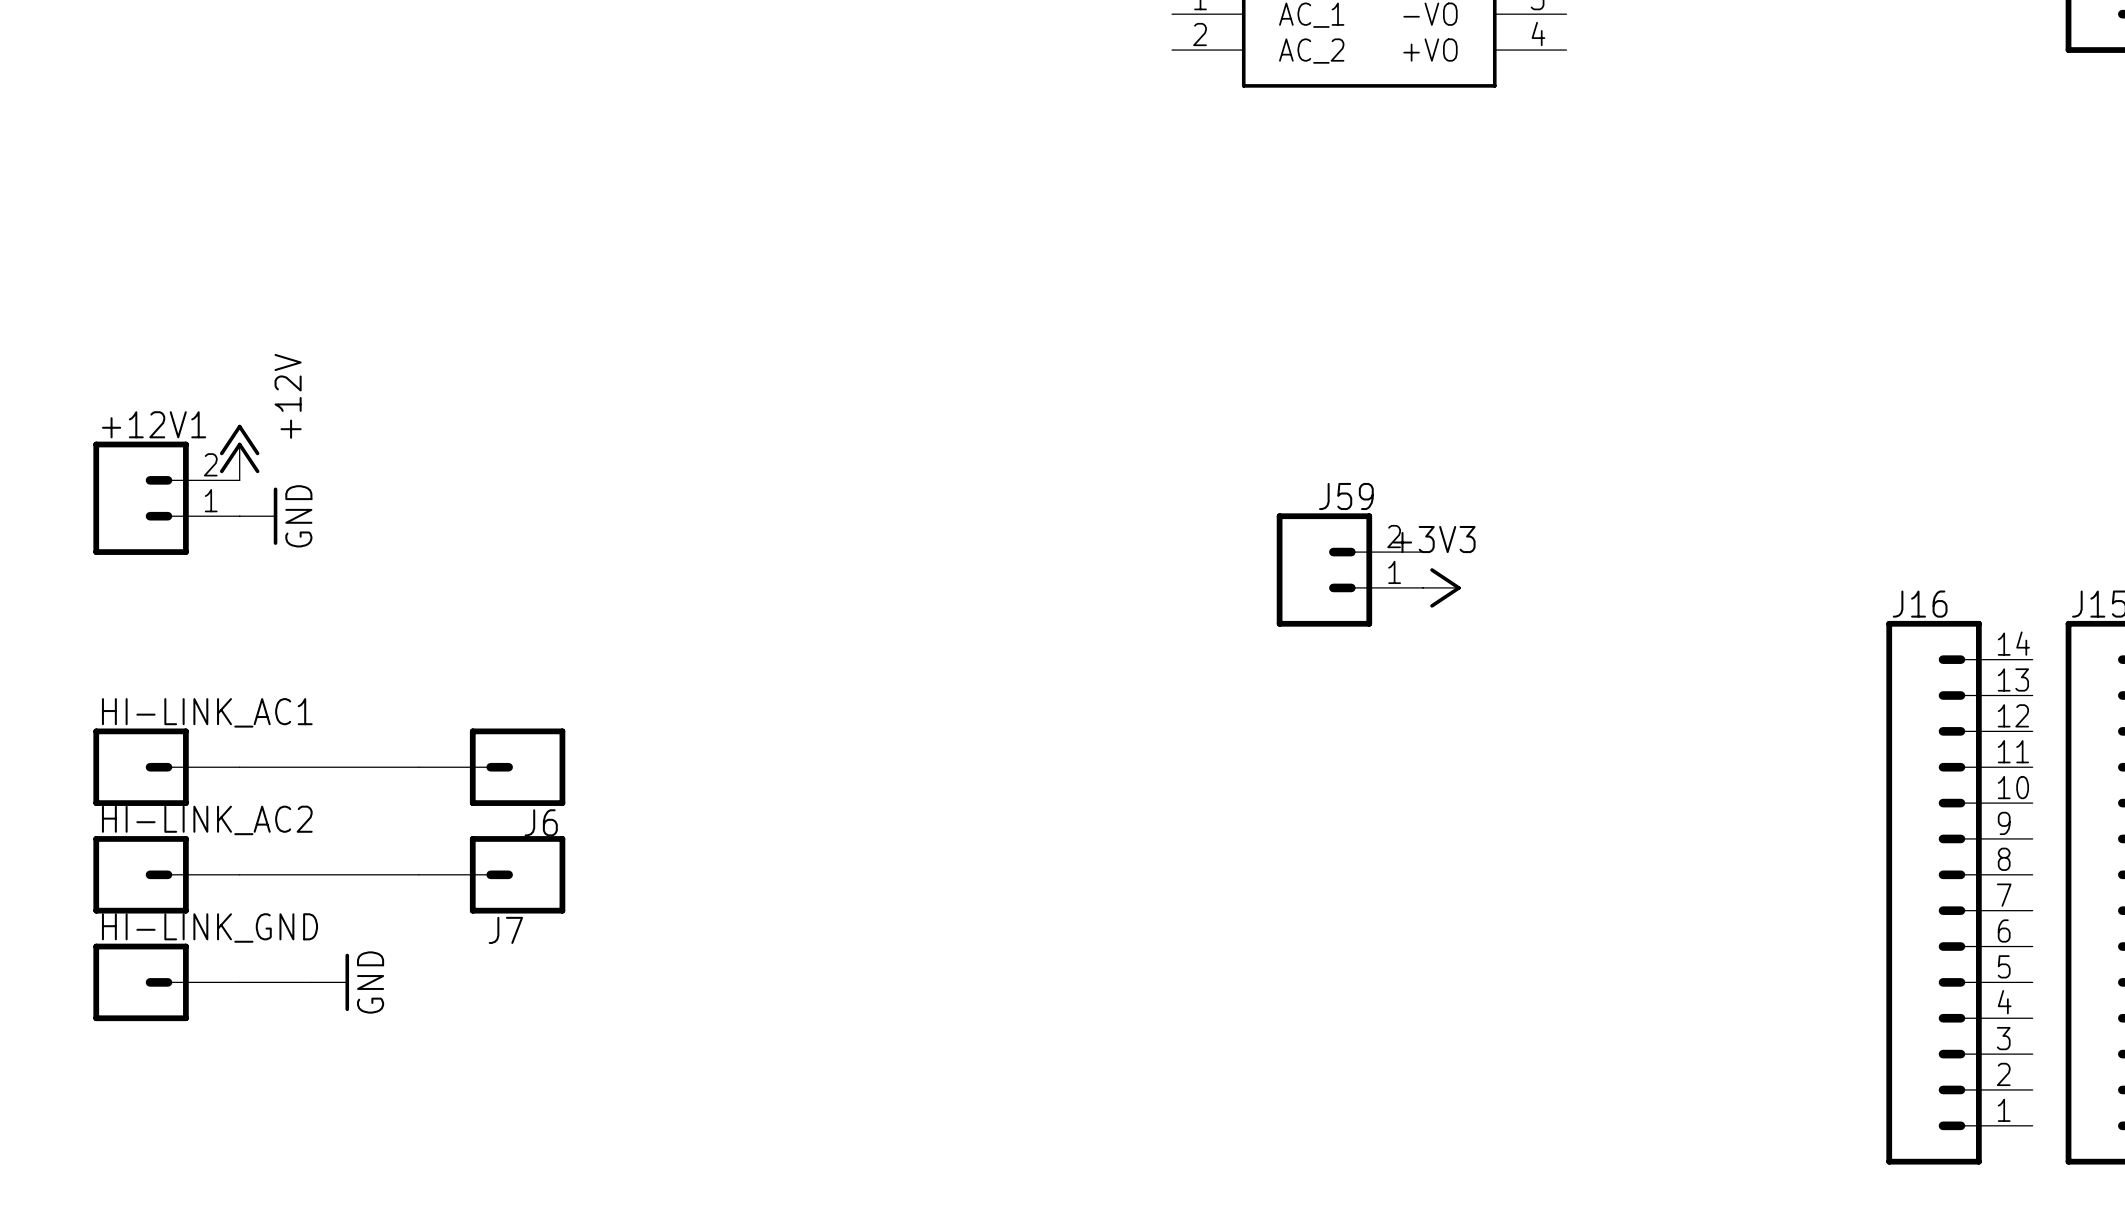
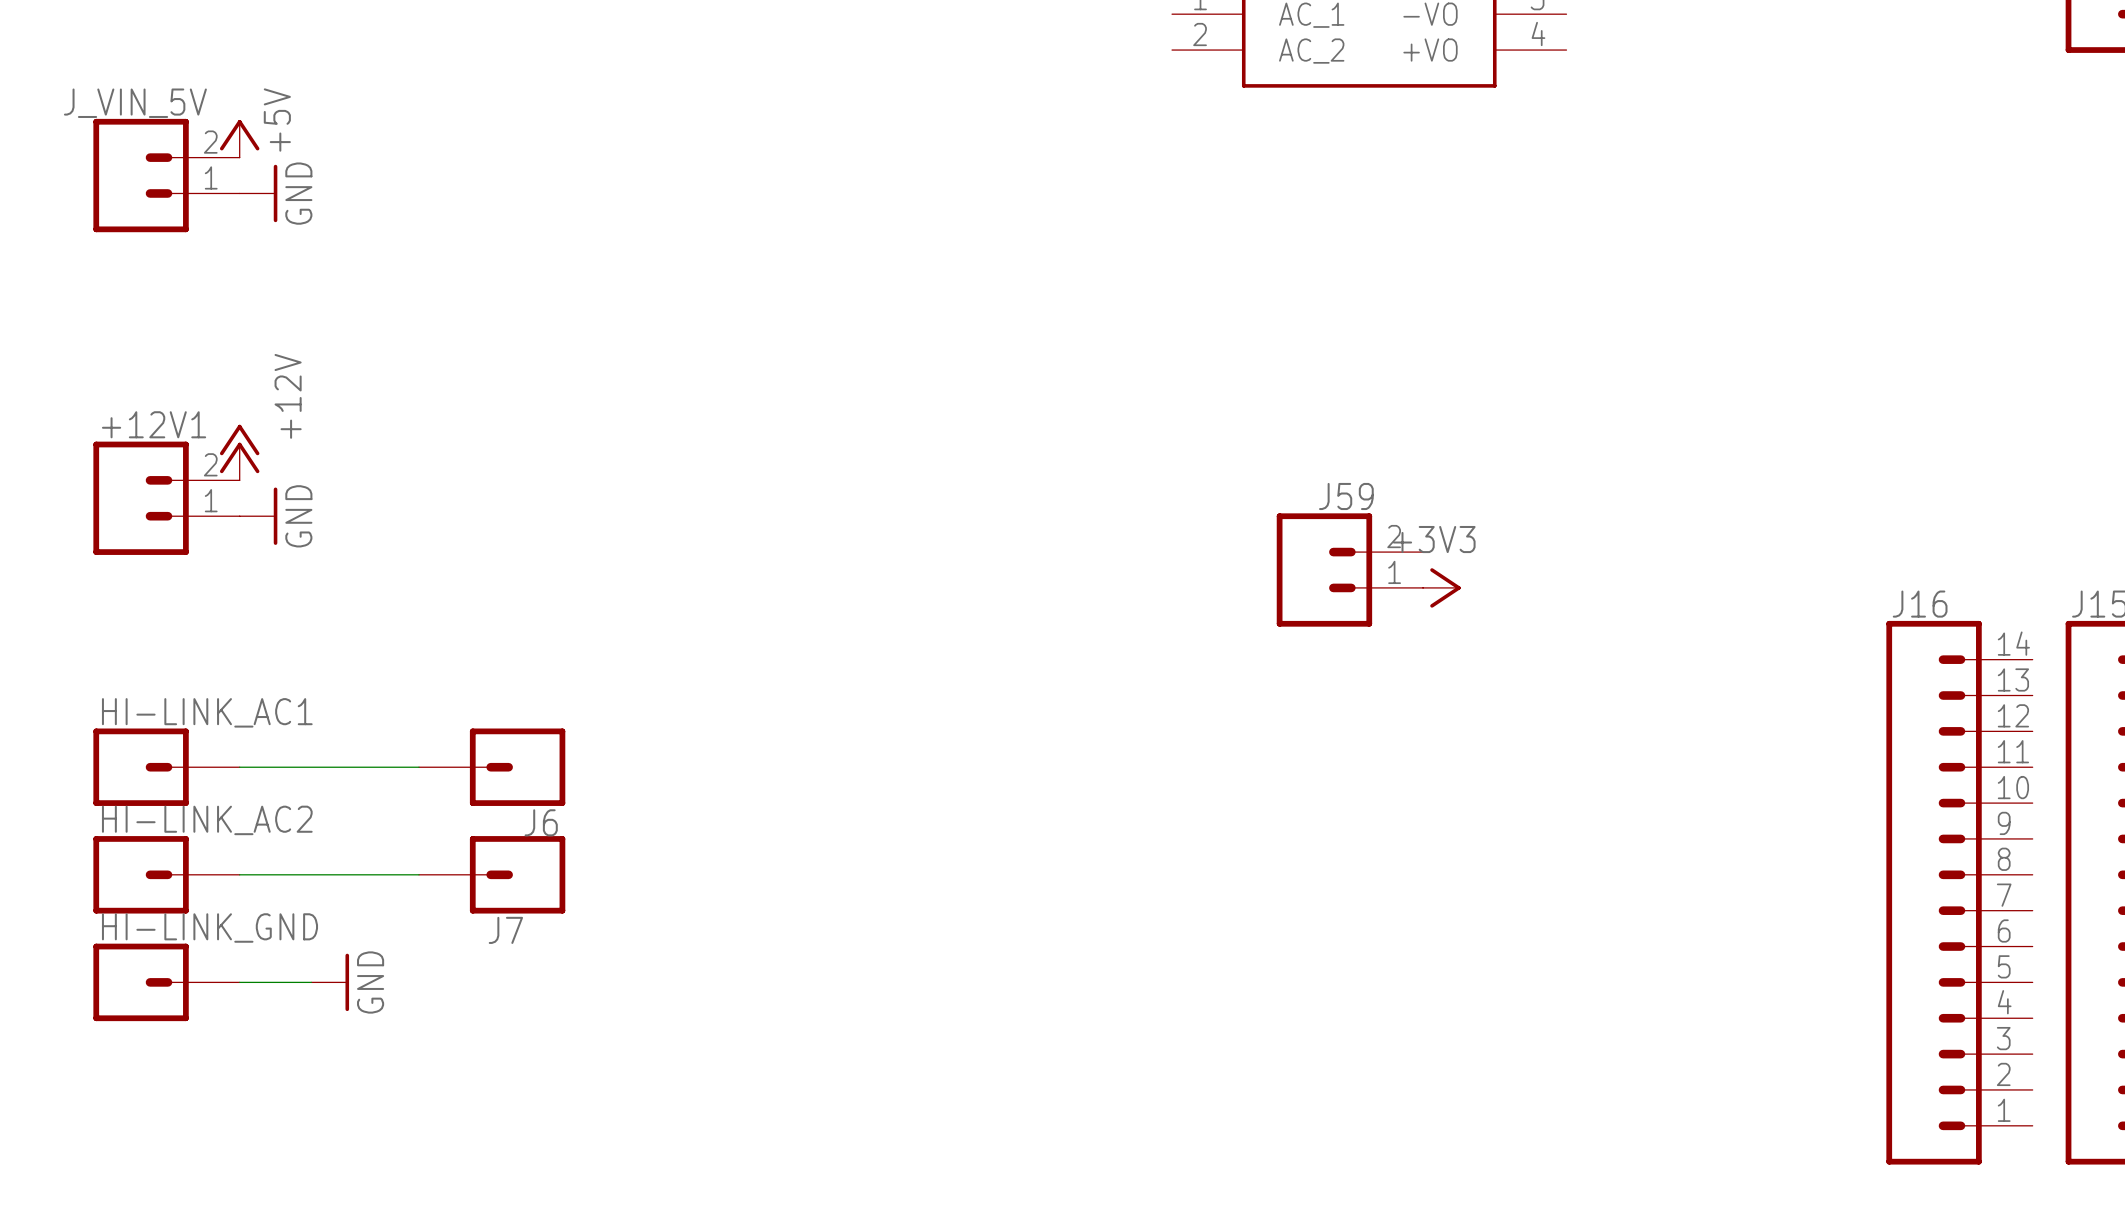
power symbol: none -> +5V (239, 138)
J_VIN_5V: none -> (166, 175)
power symbol: none -> GND (258, 193)

